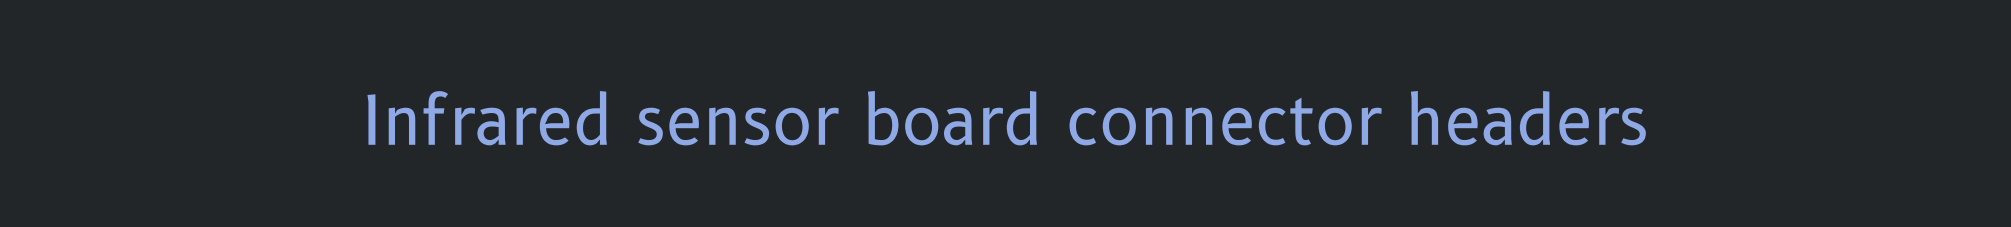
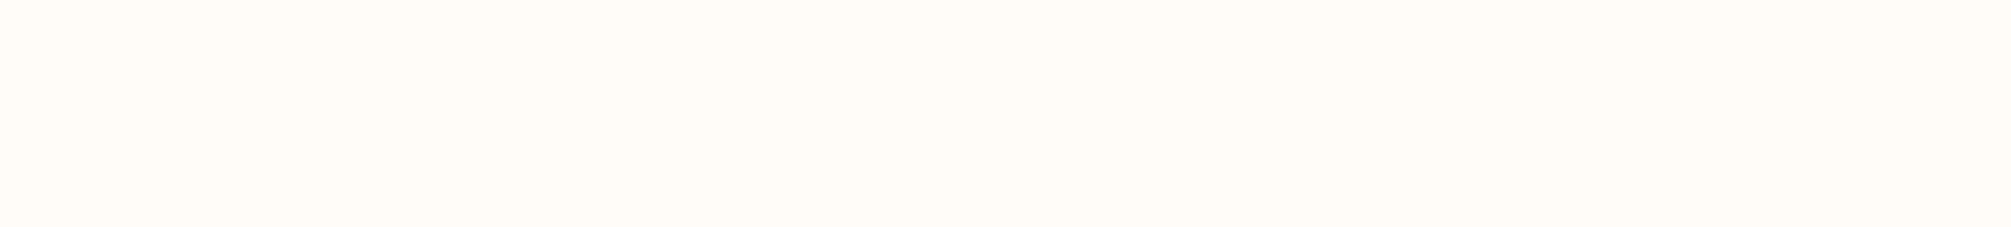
text: Infrared sensor board connector headers (1006, 118) -> none

